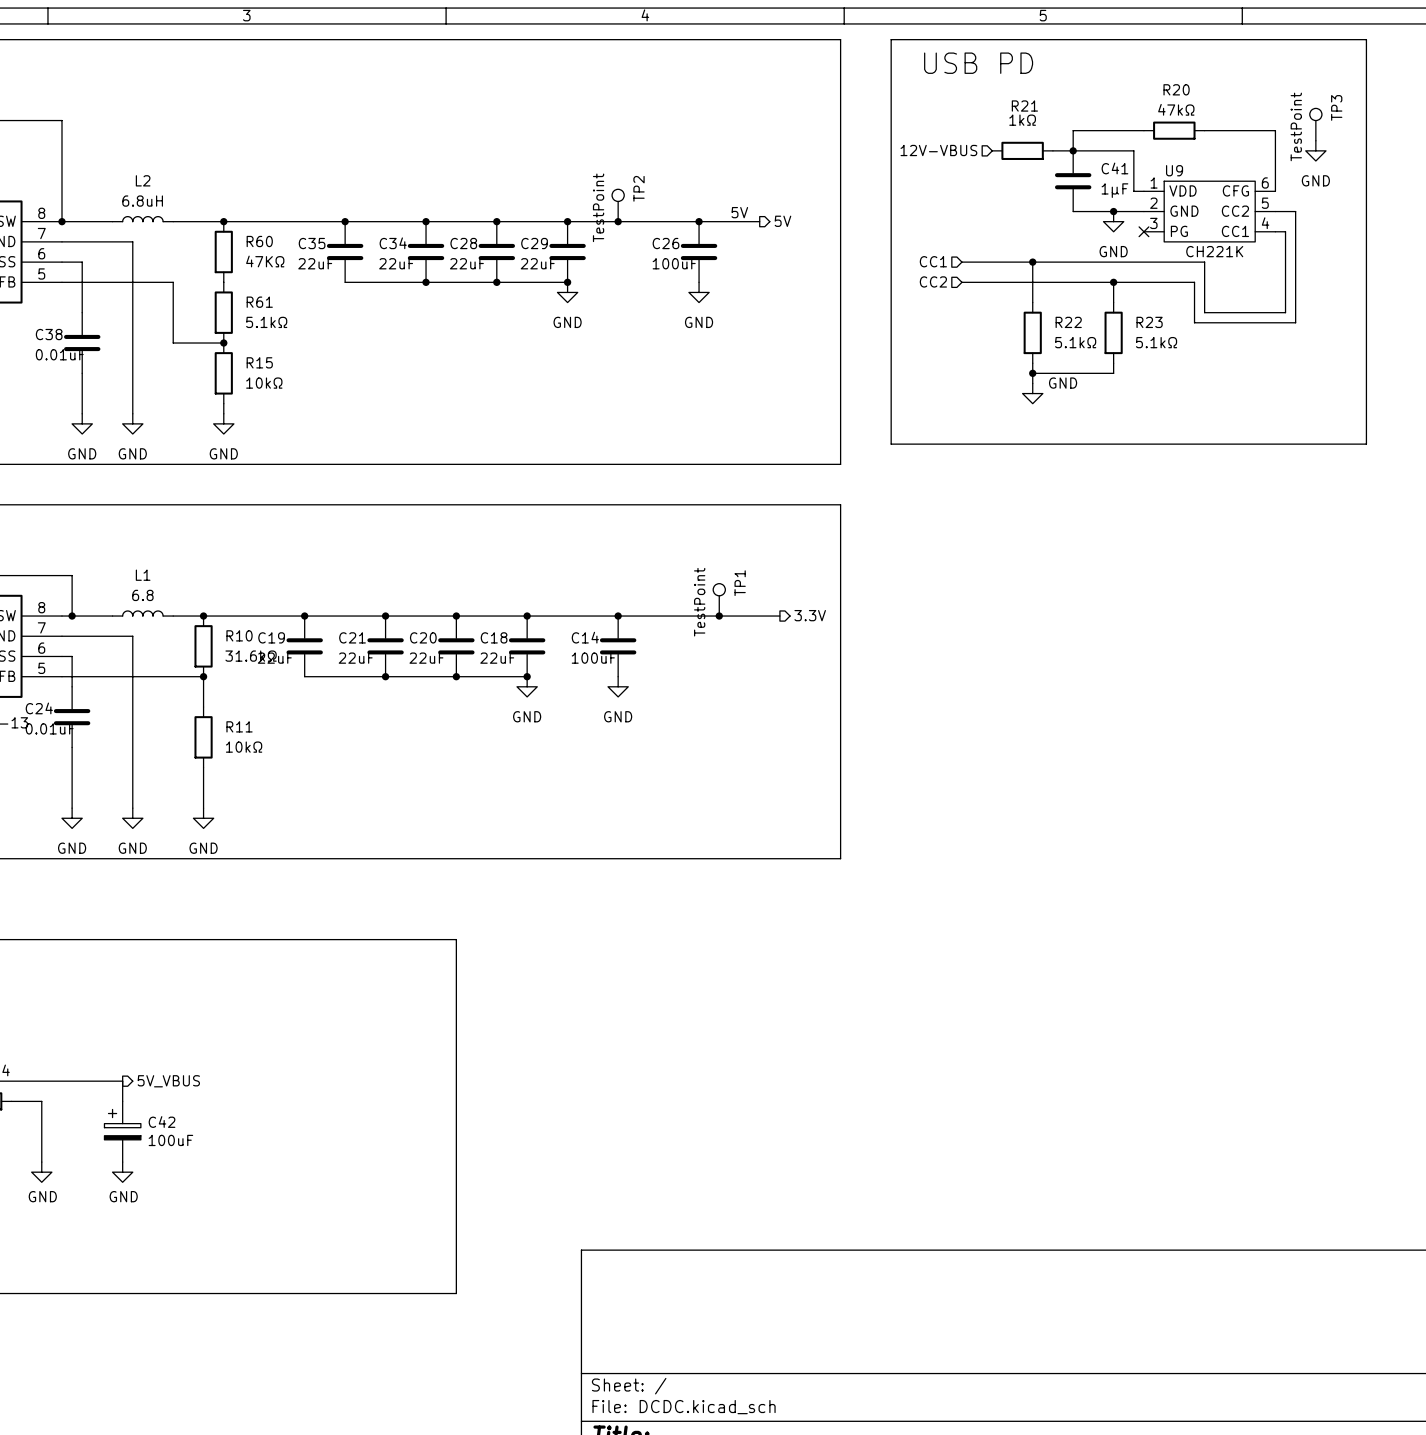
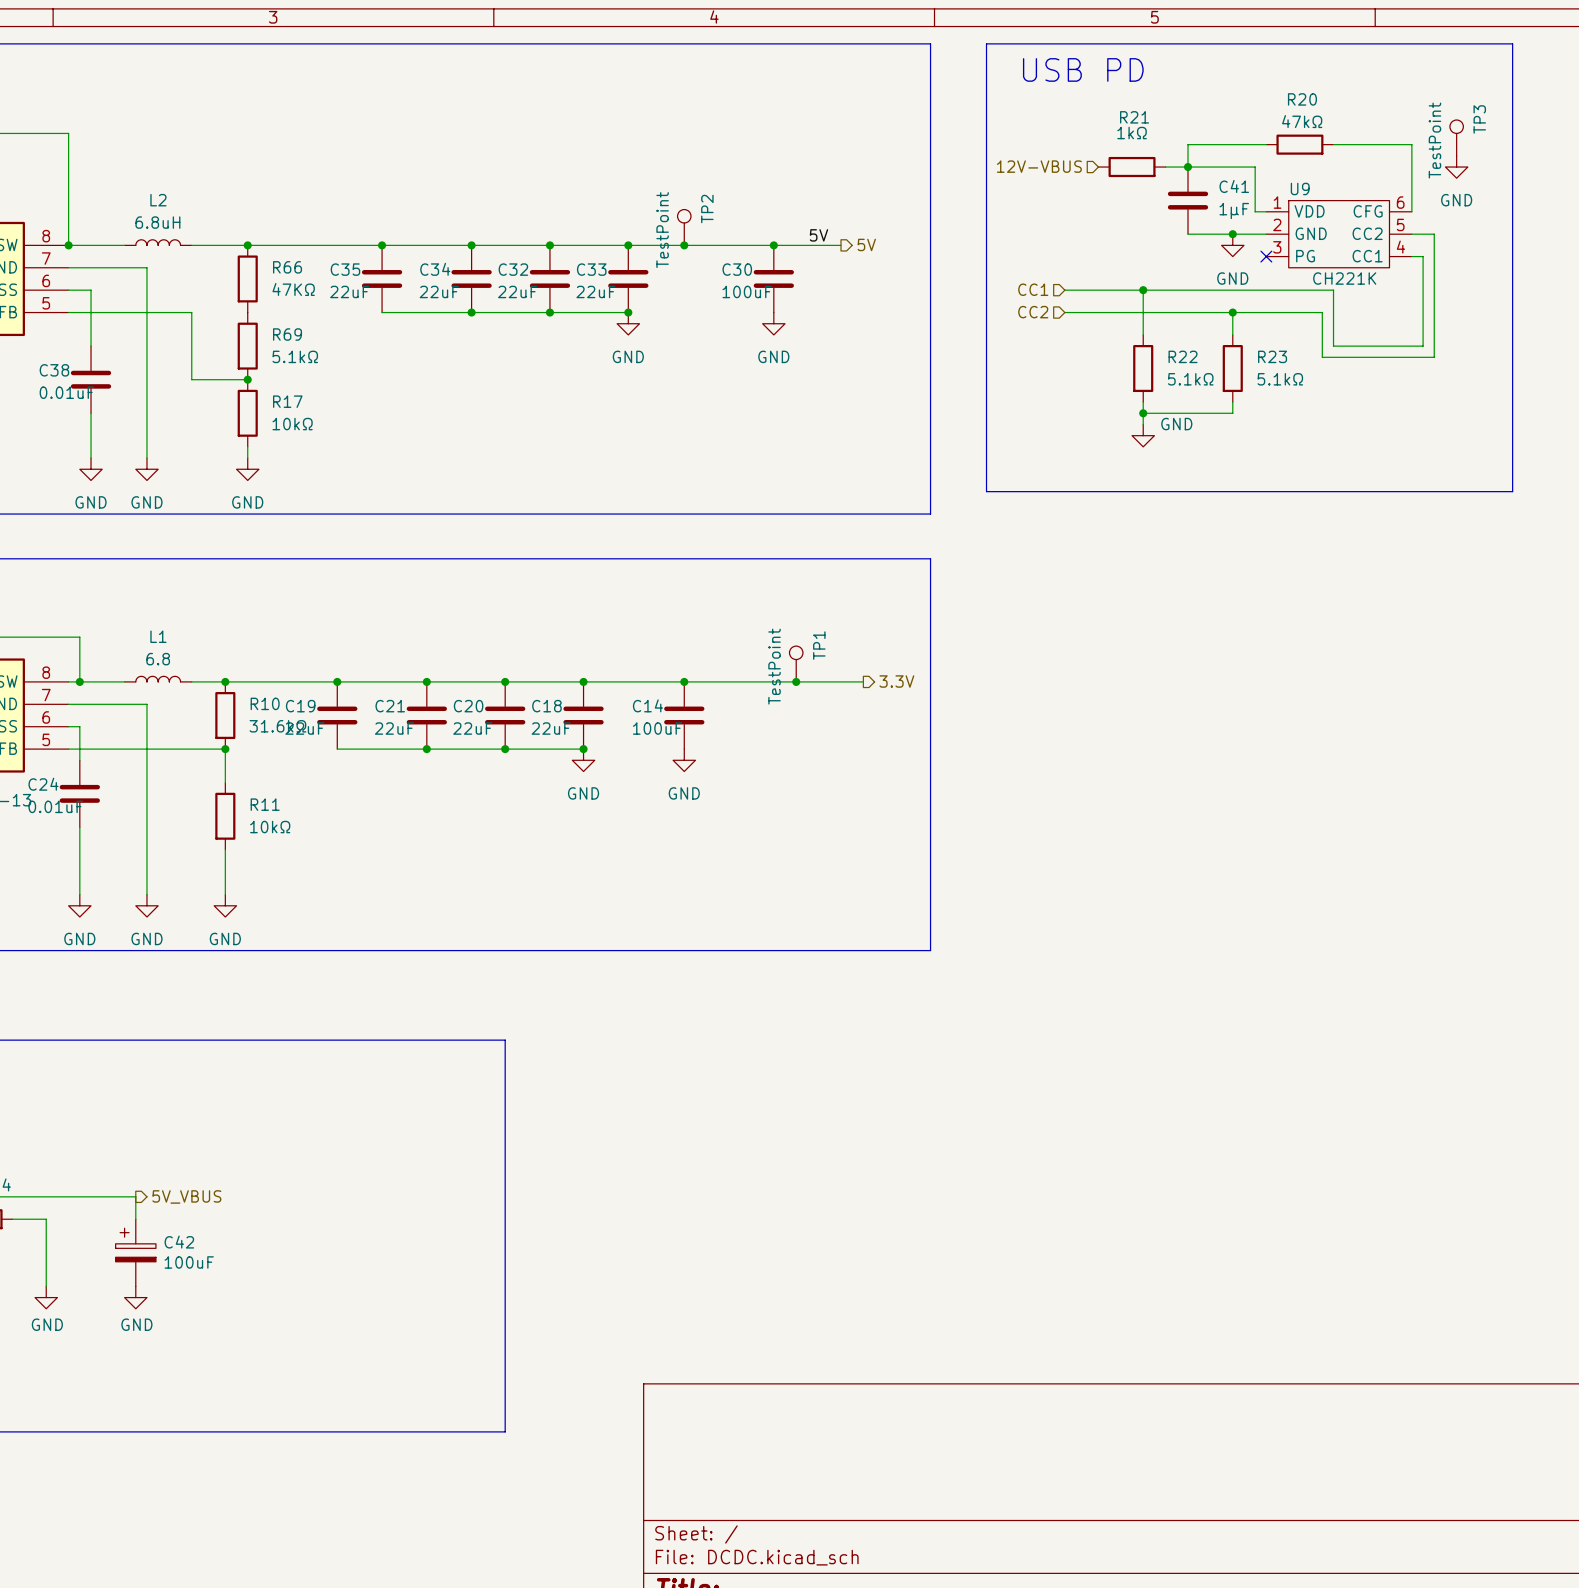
R60 name: R60 (259, 241) -> R66 (287, 267)
C28 name: C28 (463, 243) -> C32 (513, 269)
C29 name: C29 (534, 243) -> C33 (591, 269)
C26 name: C26 (665, 243) -> C30 (737, 269)
R61 name: R61 (259, 302) -> R69 (287, 334)
R15 name: R15 (259, 362) -> R17 (287, 401)

